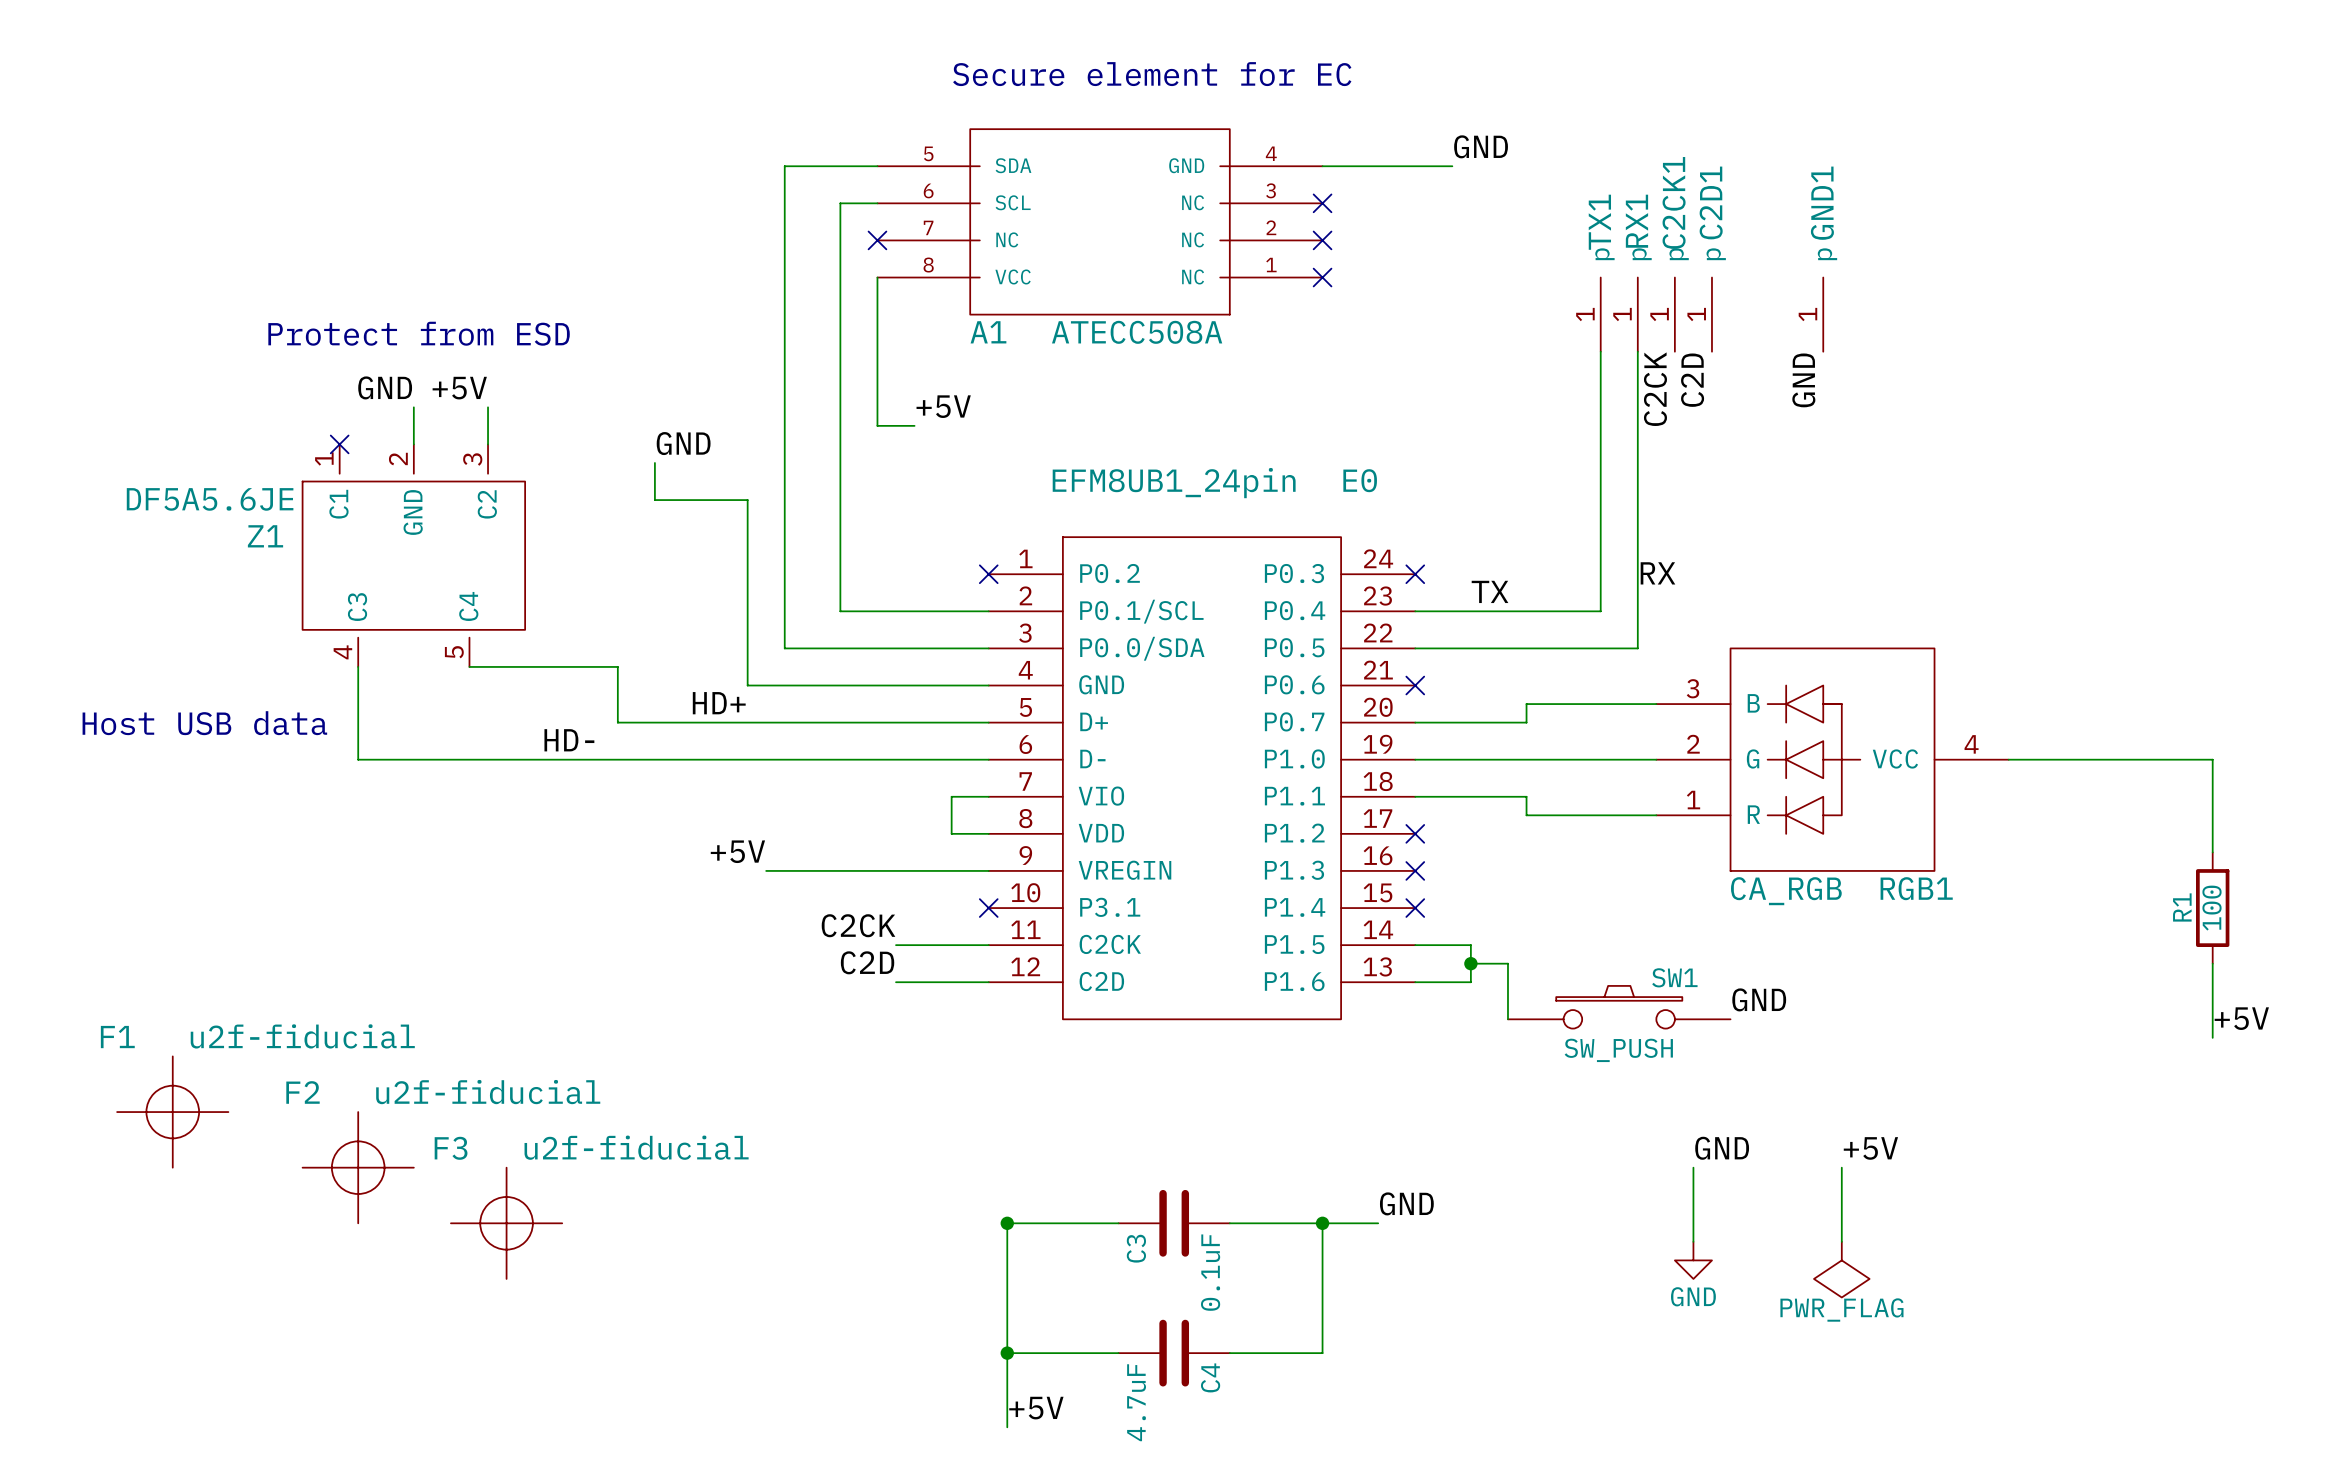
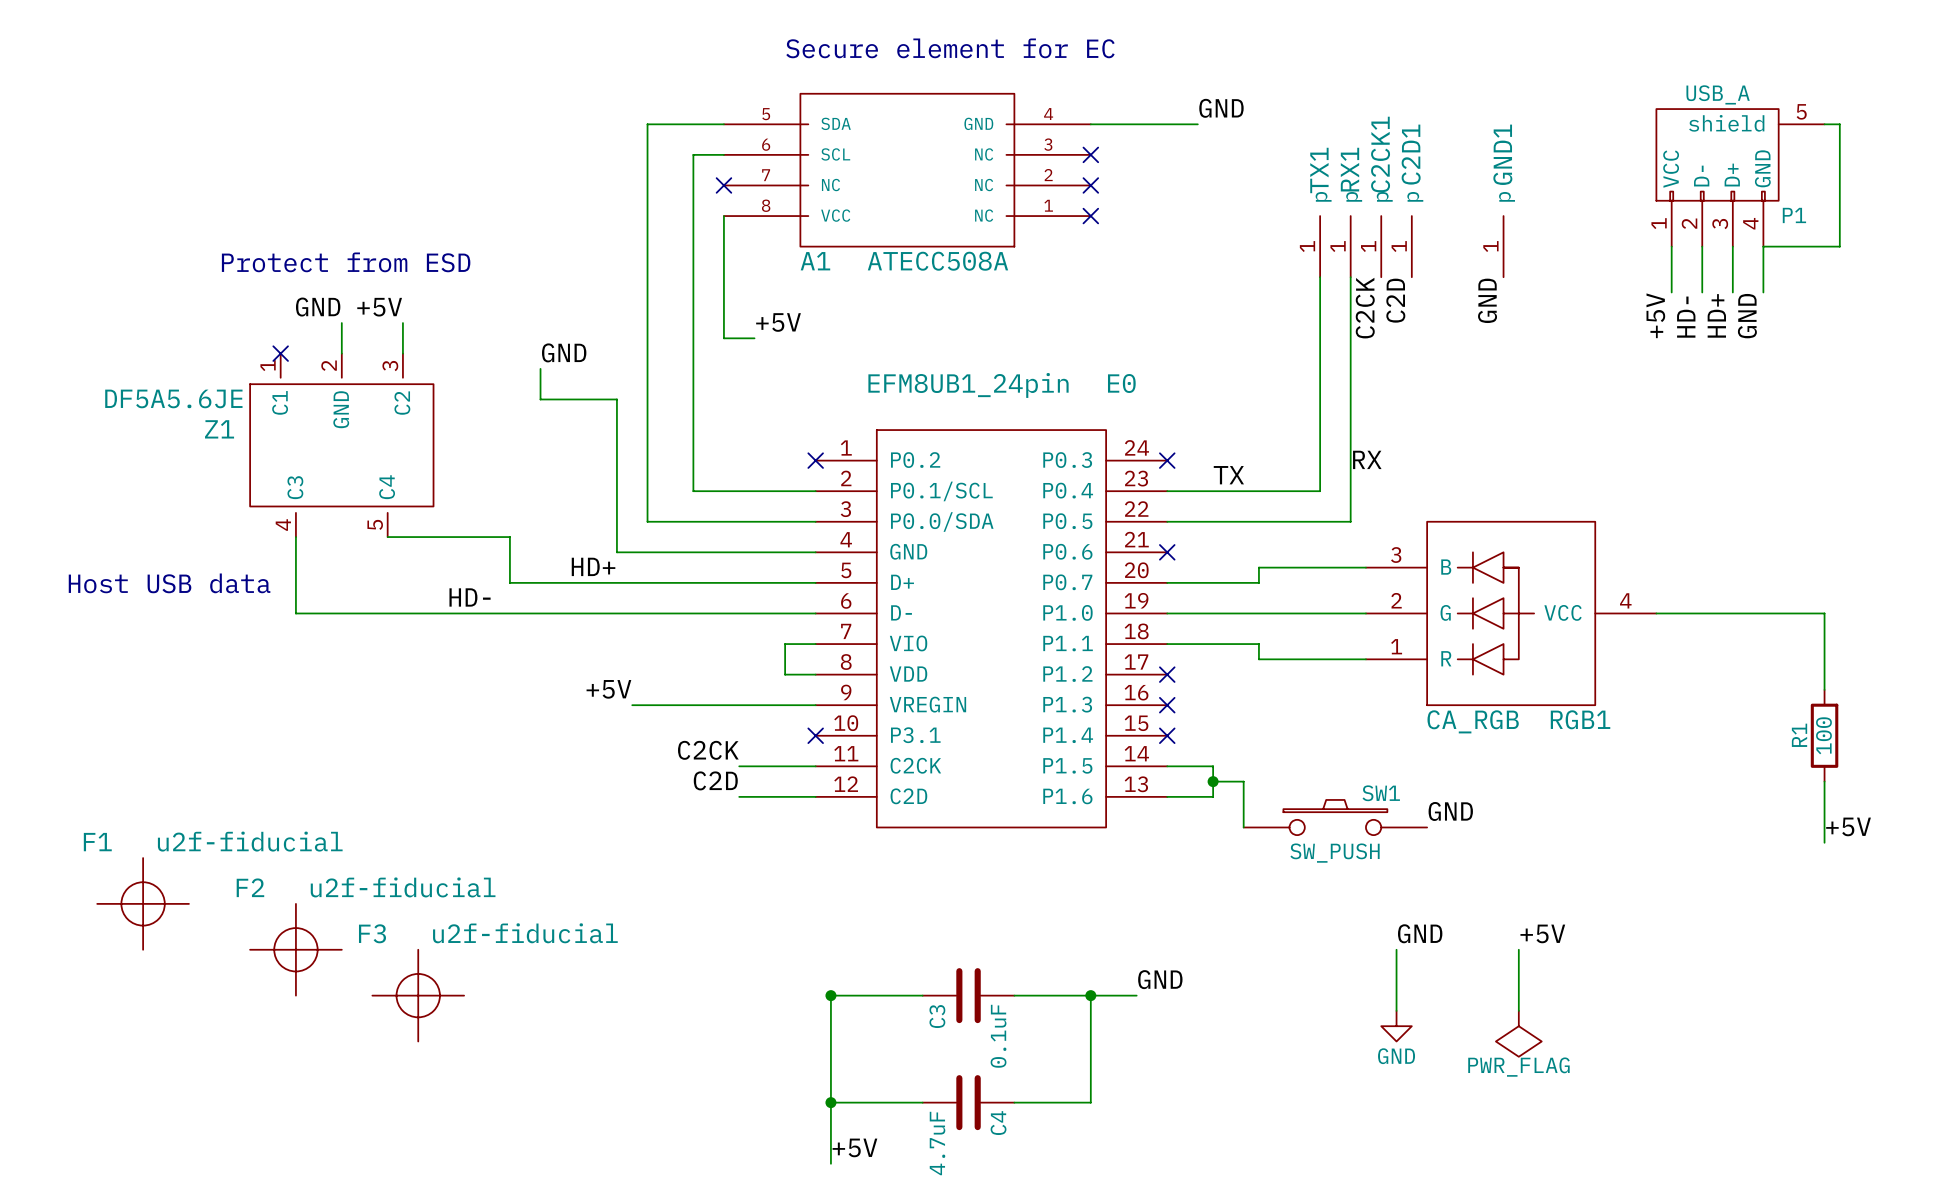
wire: none -> (1824, 124) (1839, 124) (1839, 246) (1763, 246) (1763, 292)
P1: none -> USB_A (1740, 177)
wire: none -> (1671, 246) (1671, 292)
wire: none -> (1702, 246) (1702, 292)
wire: none -> (1732, 246) (1732, 292)
label: none -> +5V (1655, 315)
label: none -> HD+ (1716, 315)
label: none -> GND (1747, 316)
label: none -> HD- (1686, 317)

